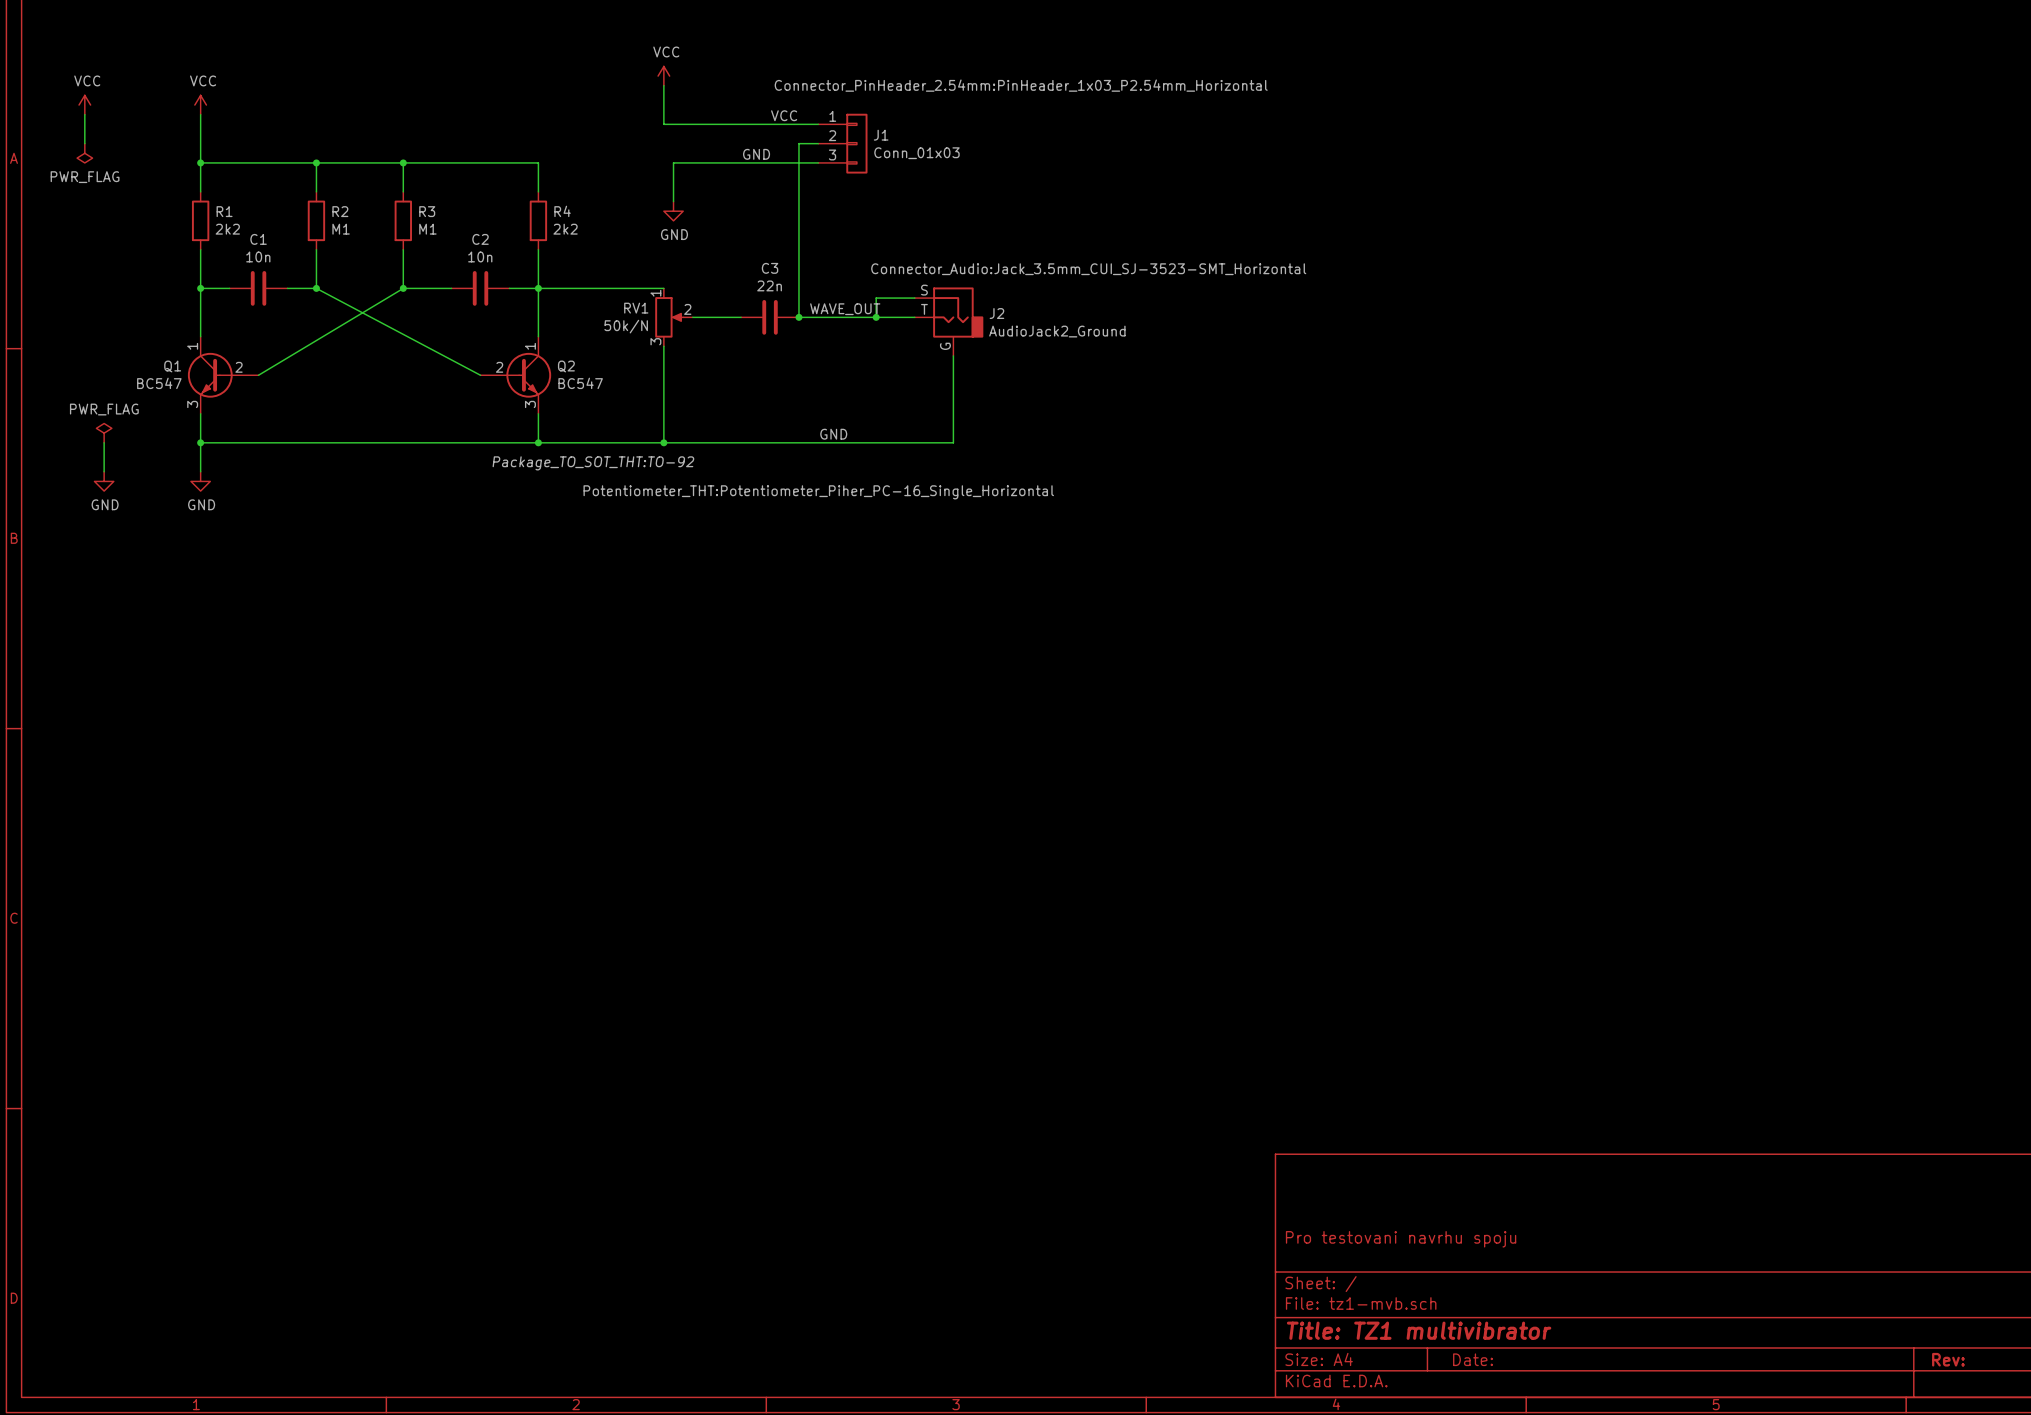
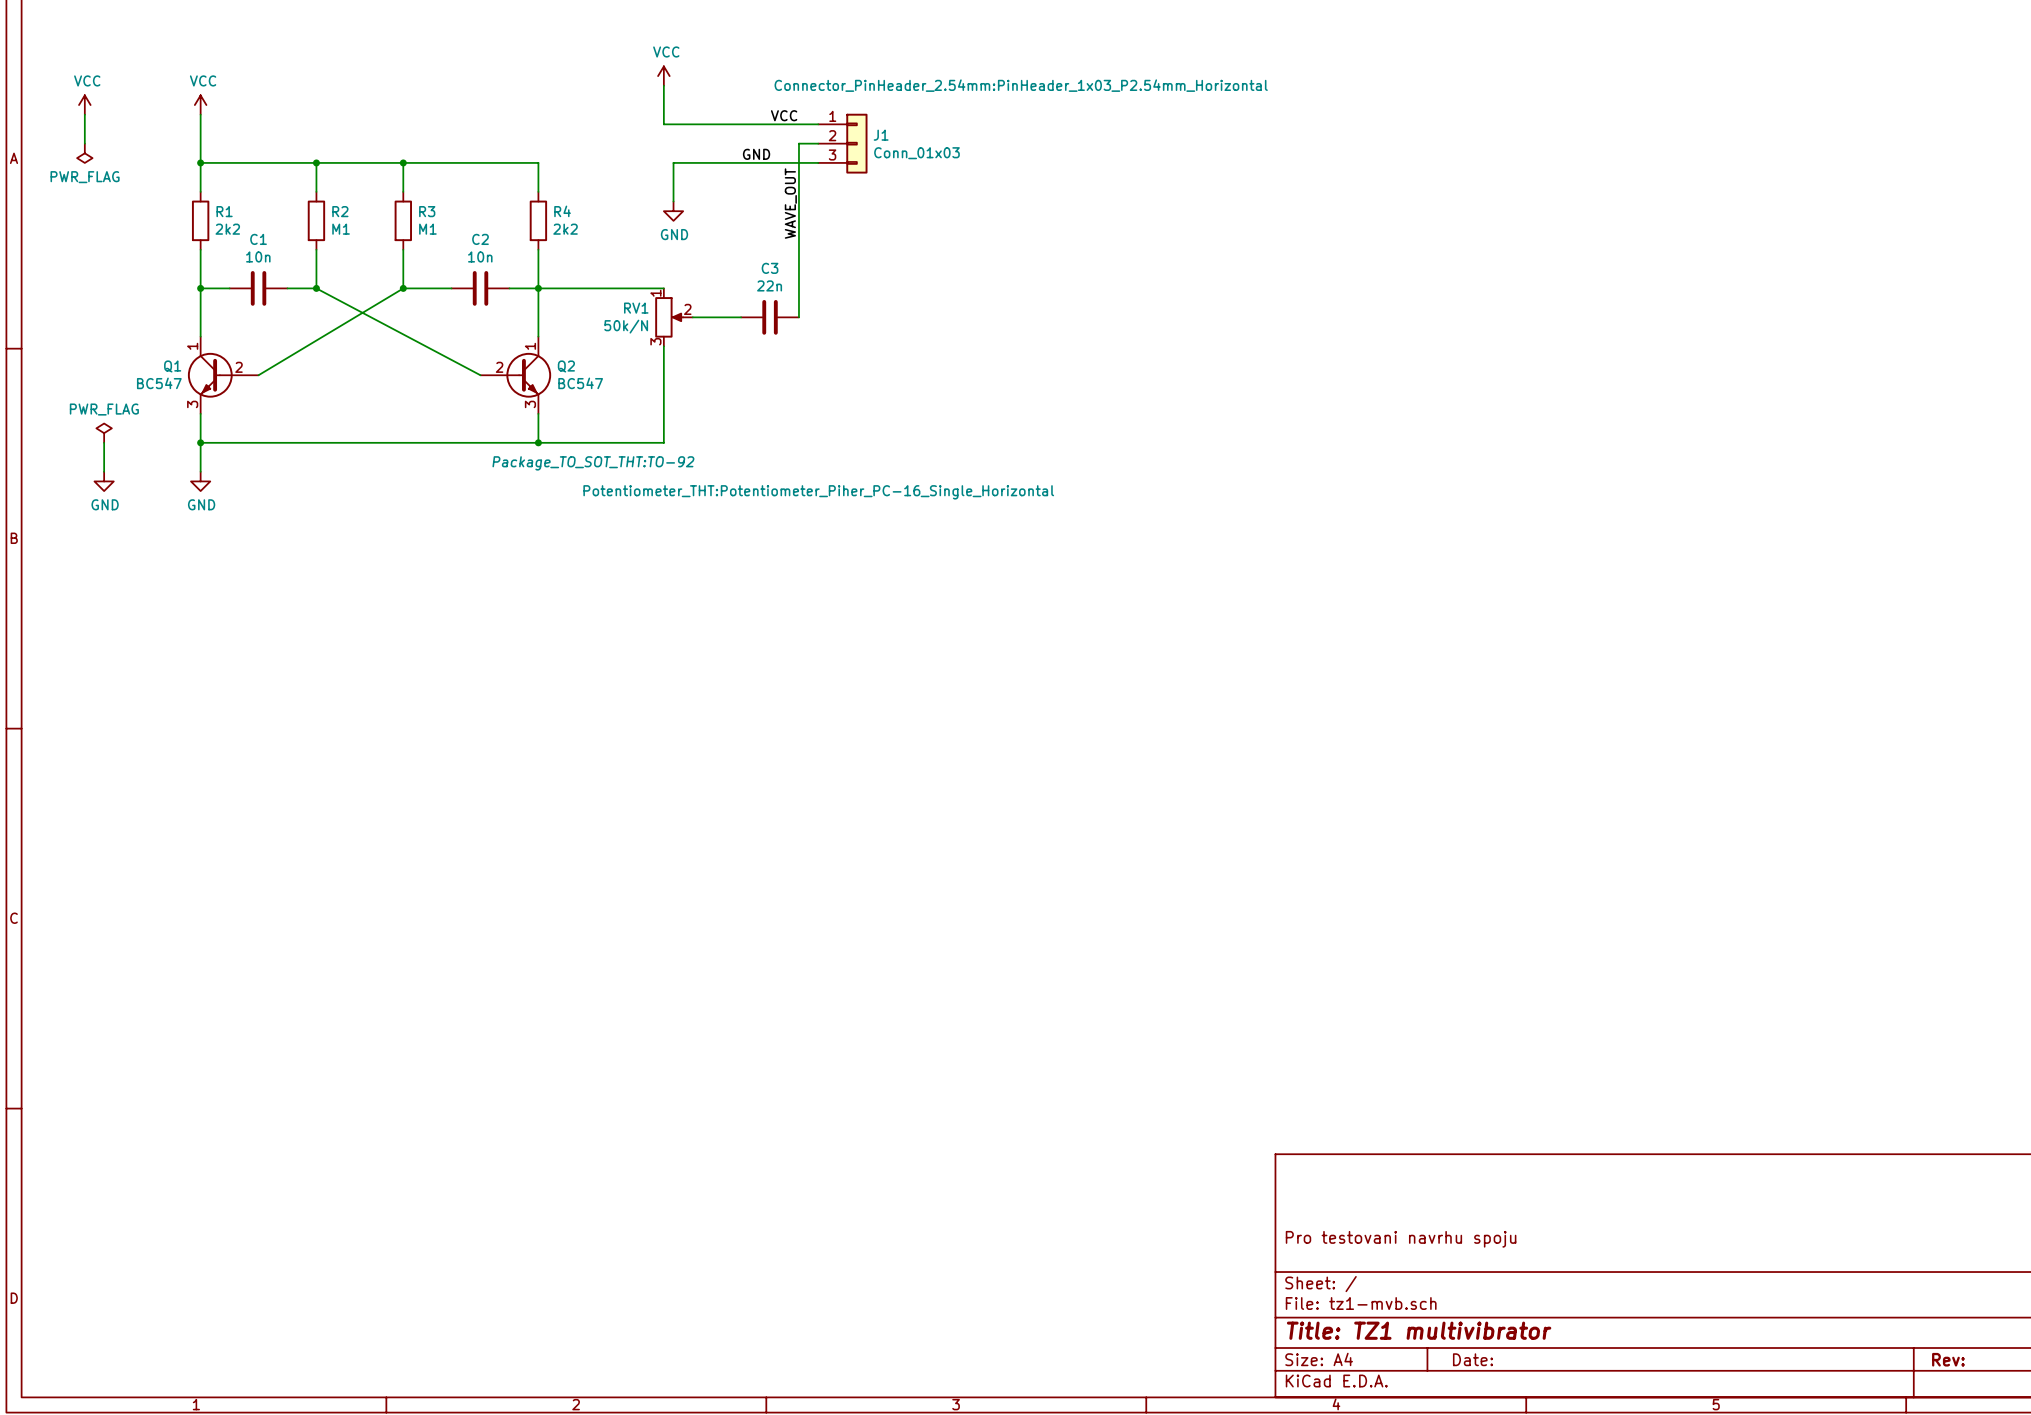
wire: (914, 298) (876, 298) (876, 317) -> none
label rotation: 0° (845, 309) -> 90° counterclockwise (790, 203)
label position: WAVE_OUT (845, 309) -> WAVE_OUT (790, 203)
wire: (798, 317) (914, 317) -> none
junction: (798, 317) -> none
junction: (876, 317) -> none
J2: AudioJack2_Ground (949, 321) -> none
wire: (953, 355) (953, 442) (663, 442) -> none
label: GND (833, 434) -> none
junction: (663, 442) -> none

